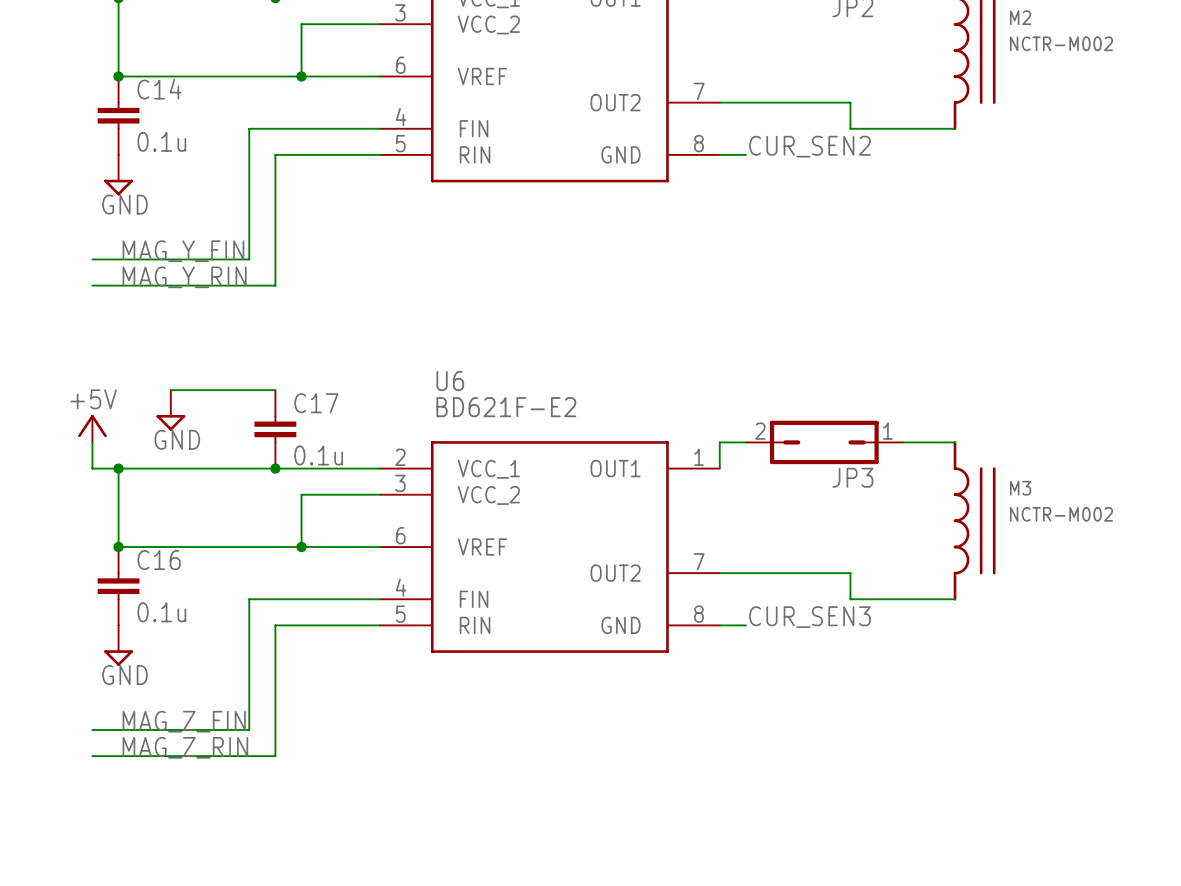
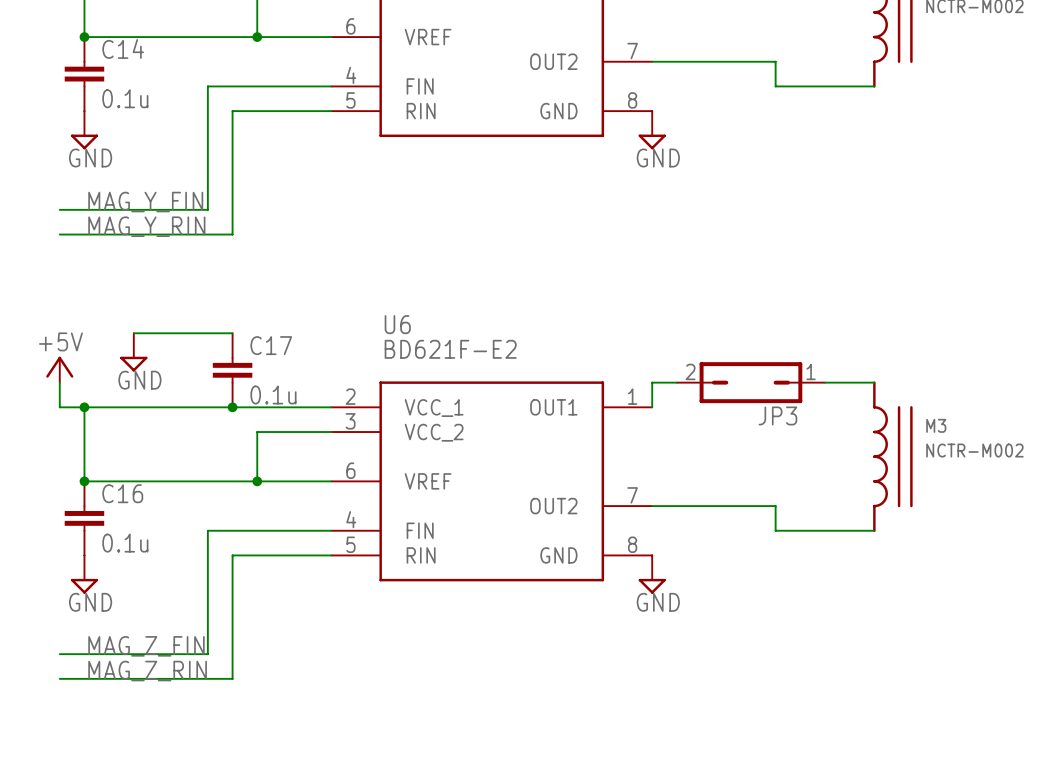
label: CUR_SEN2 (809, 146) -> none
wire: (719, 154) (745, 154) -> none
power symbol: none -> GND (652, 130)
label: CUR_SEN3 (809, 617) -> none
wire: (719, 625) (745, 625) -> none
power symbol: none -> GND (652, 574)

